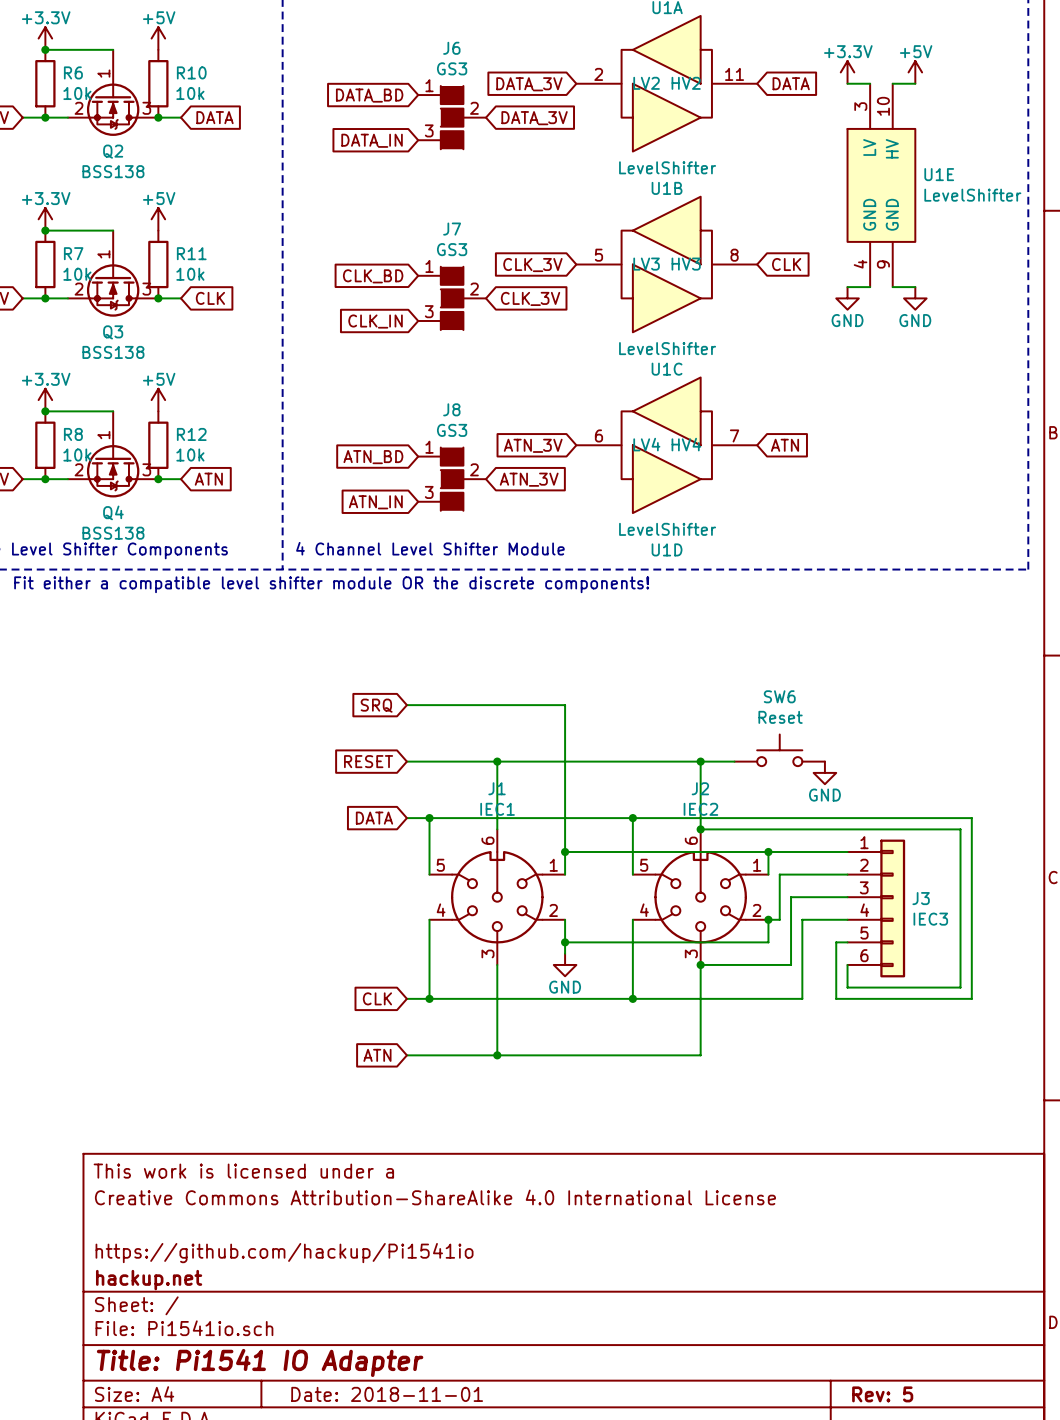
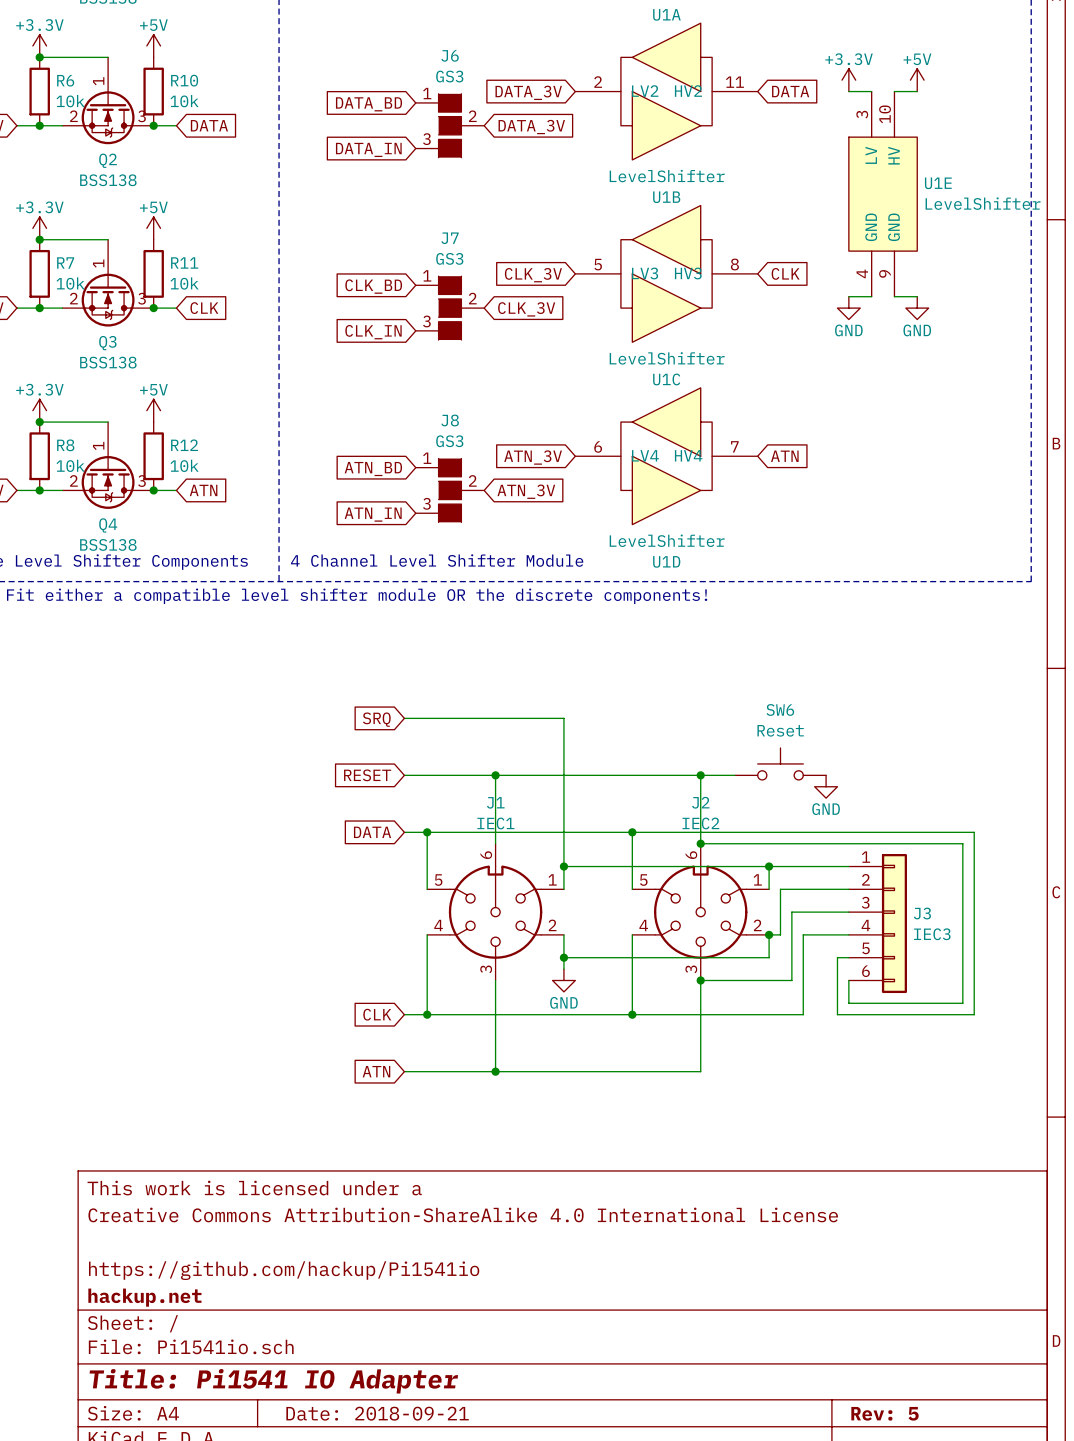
title block: Date: 2018-11-01 (387, 1394) -> Date: 2018-09-21 (377, 1413)

